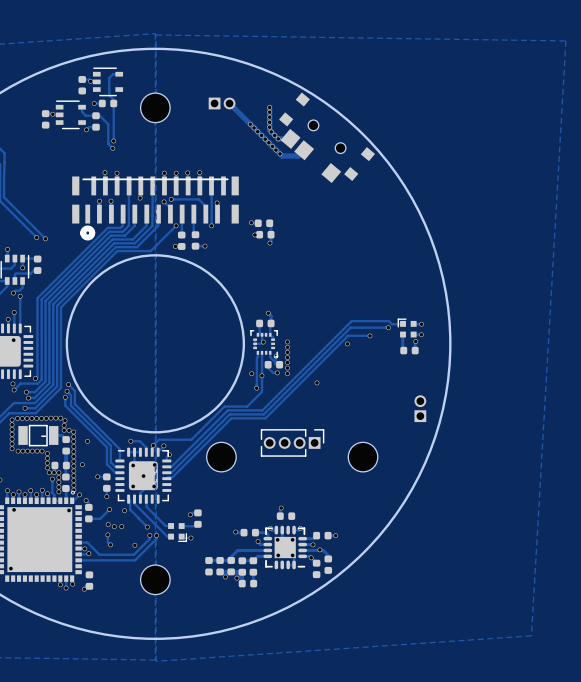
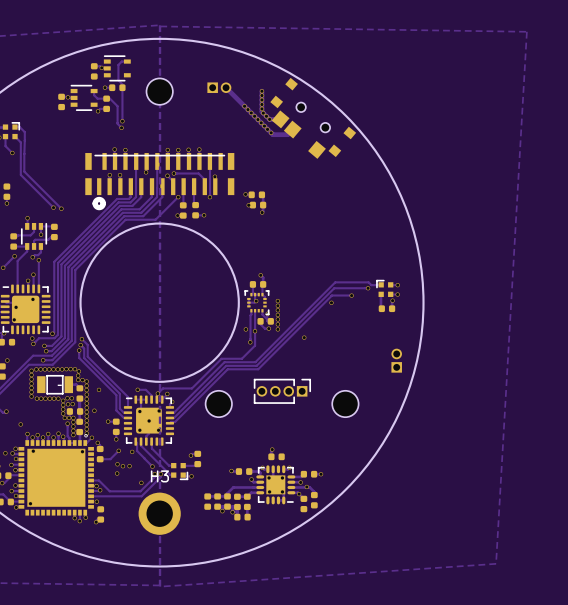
via: none -> (67, 398)
via: none -> (71, 398)
via: none -> (68, 404)
via: none -> (72, 404)
track: (107, 534) (107, 542) (110, 544) -> none
via position: (110, 544) -> (96, 501)
part: (155, 579) -> none
H3: none -> (159, 513)

